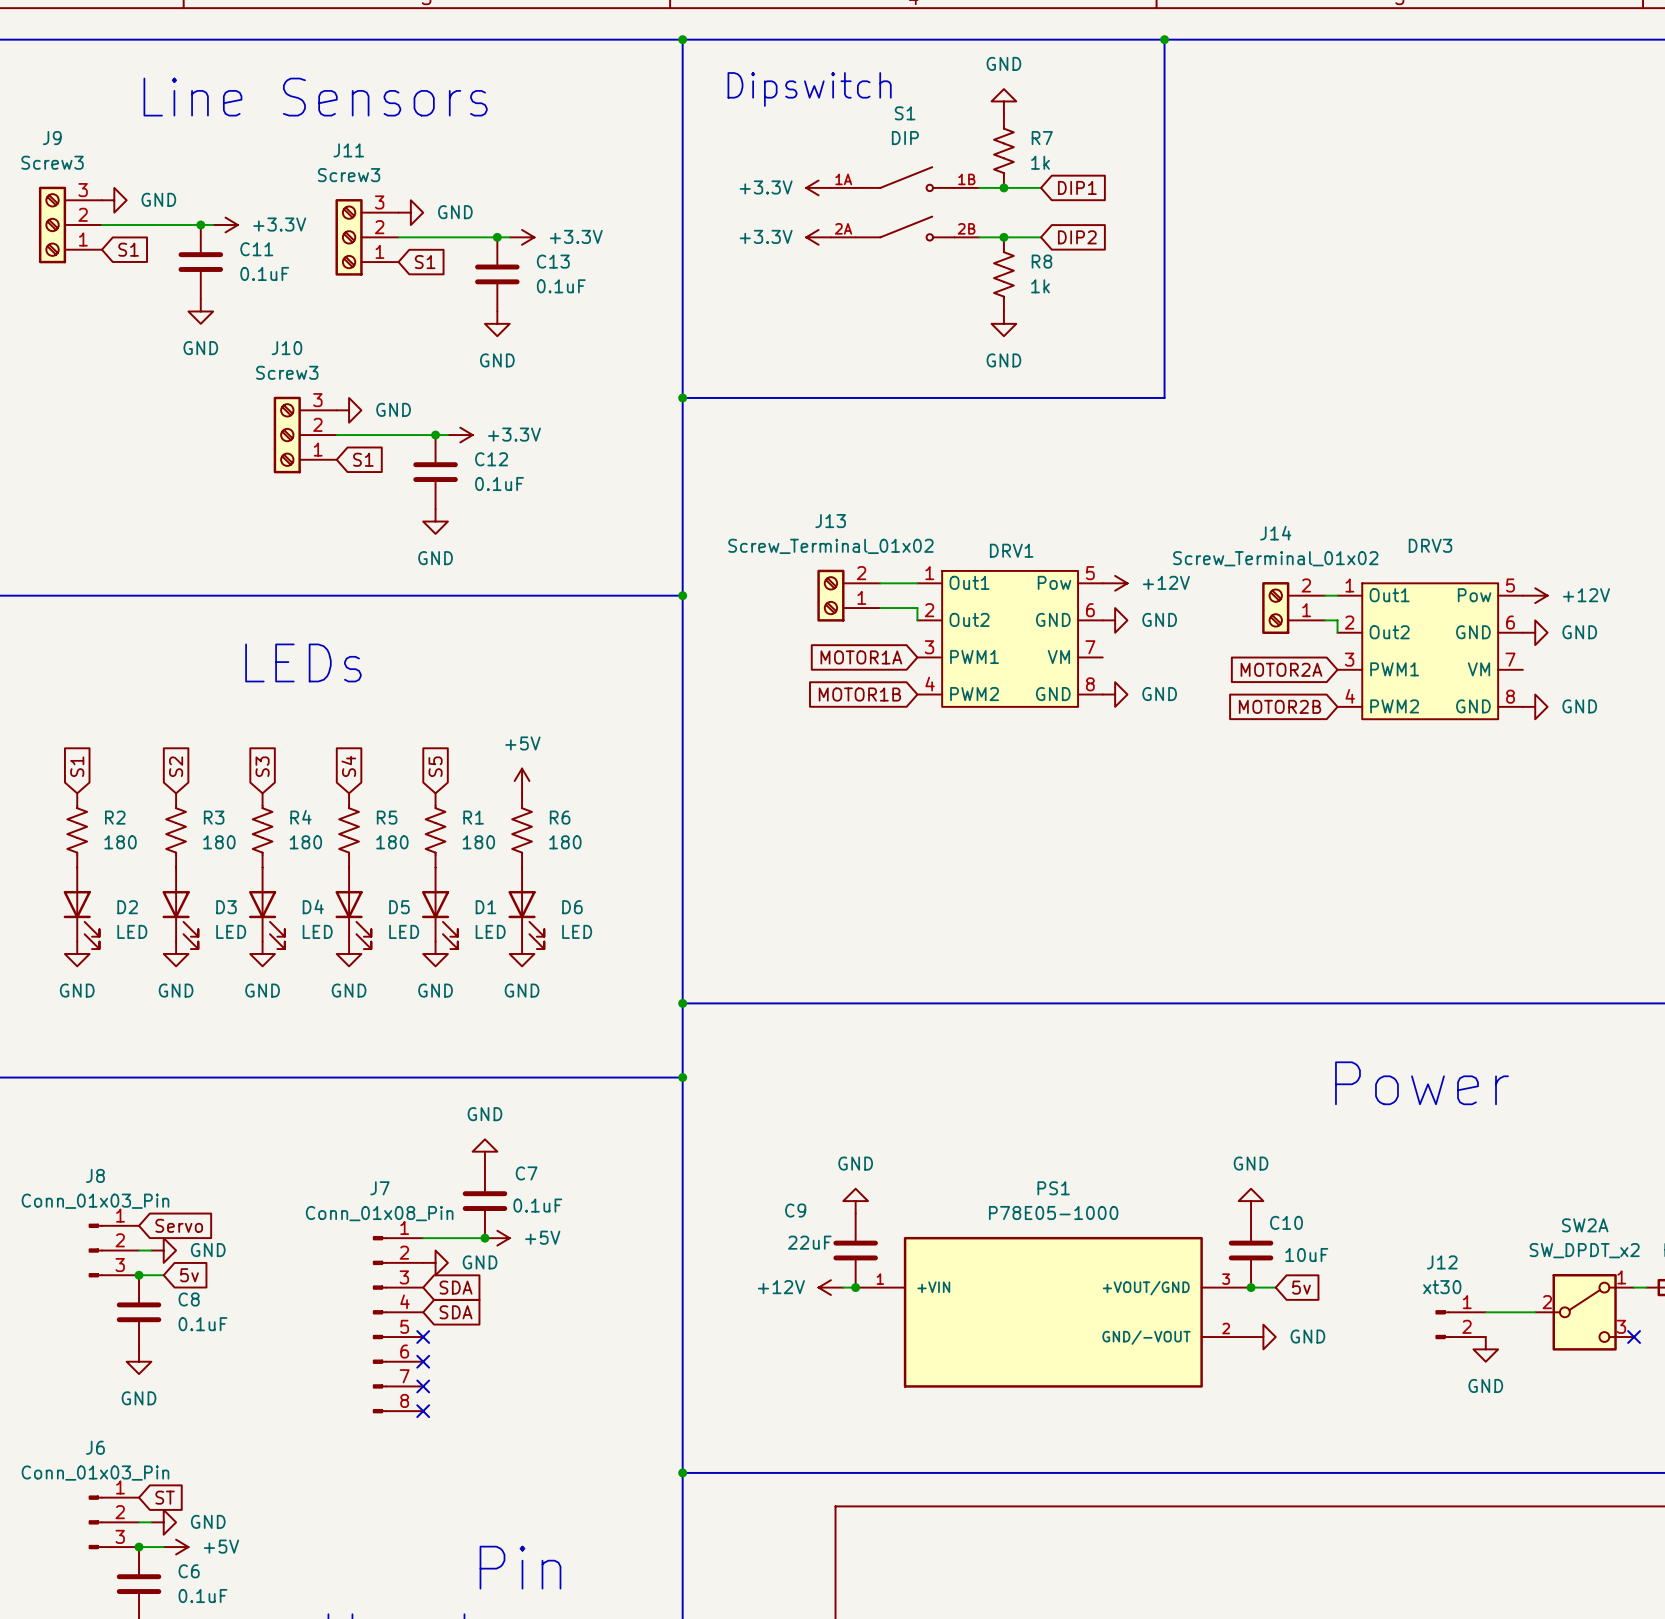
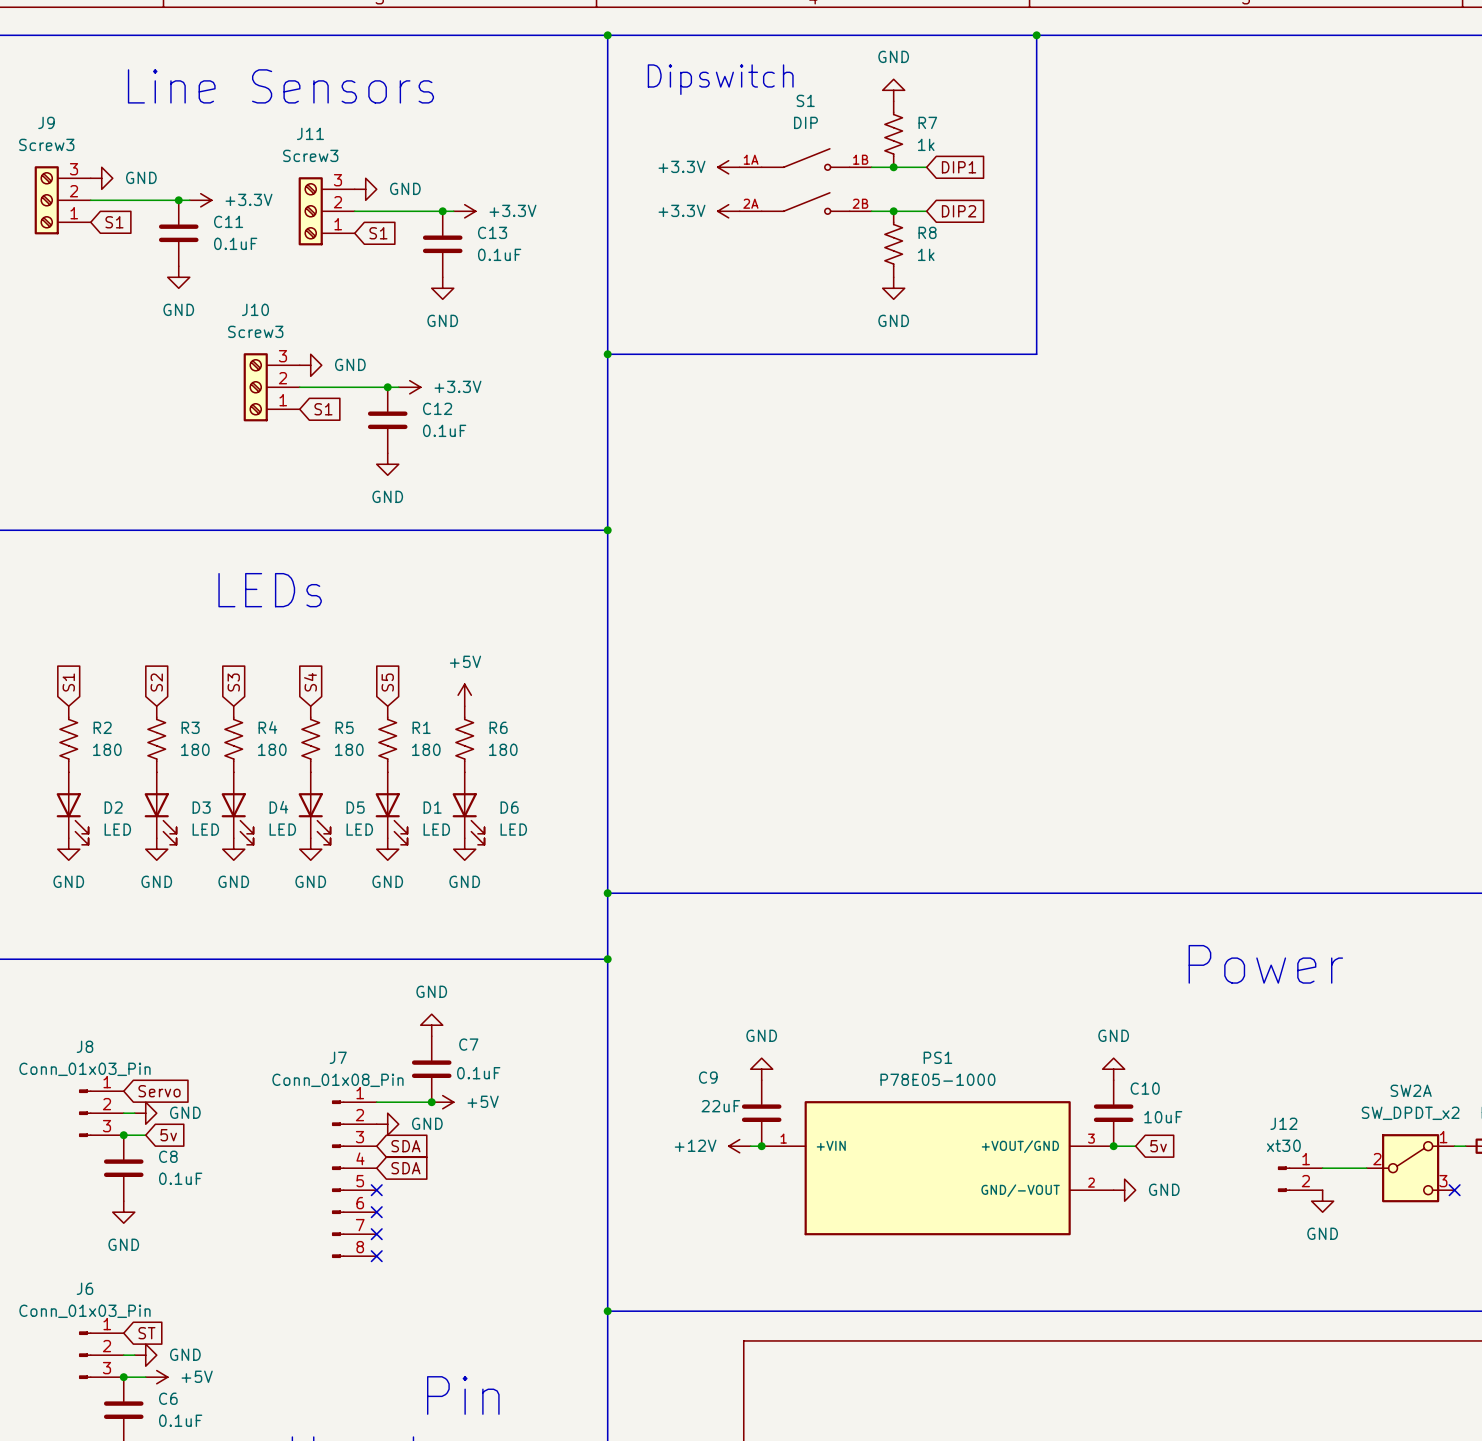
wire: (880, 583) (917, 583) -> none
power symbol: +12V (1115, 583) -> none
J13: Screw_Terminal_01x02 (848, 595) -> none
wire: (1325, 595) (1337, 595) -> none
power symbol: +12V (1535, 595) -> none
wire: (880, 608) (917, 608) (917, 620) -> none
J14: Screw_Terminal_01x02 (1293, 608) -> none
power symbol: GND (1115, 620) -> none
wire: (1325, 620) (1337, 620) (1337, 632) -> none
power symbol: GND (1535, 632) -> none
DRV1: (1010, 638) -> none
DRV3: (1430, 651) -> none
global label: MOTOR1A (861, 657) -> none
global label: MOTOR2A (1281, 669) -> none
global label: MOTOR1B (859, 694) -> none
power symbol: GND (1115, 694) -> none
global label: MOTOR2B (1279, 706) -> none
power symbol: GND (1535, 706) -> none

